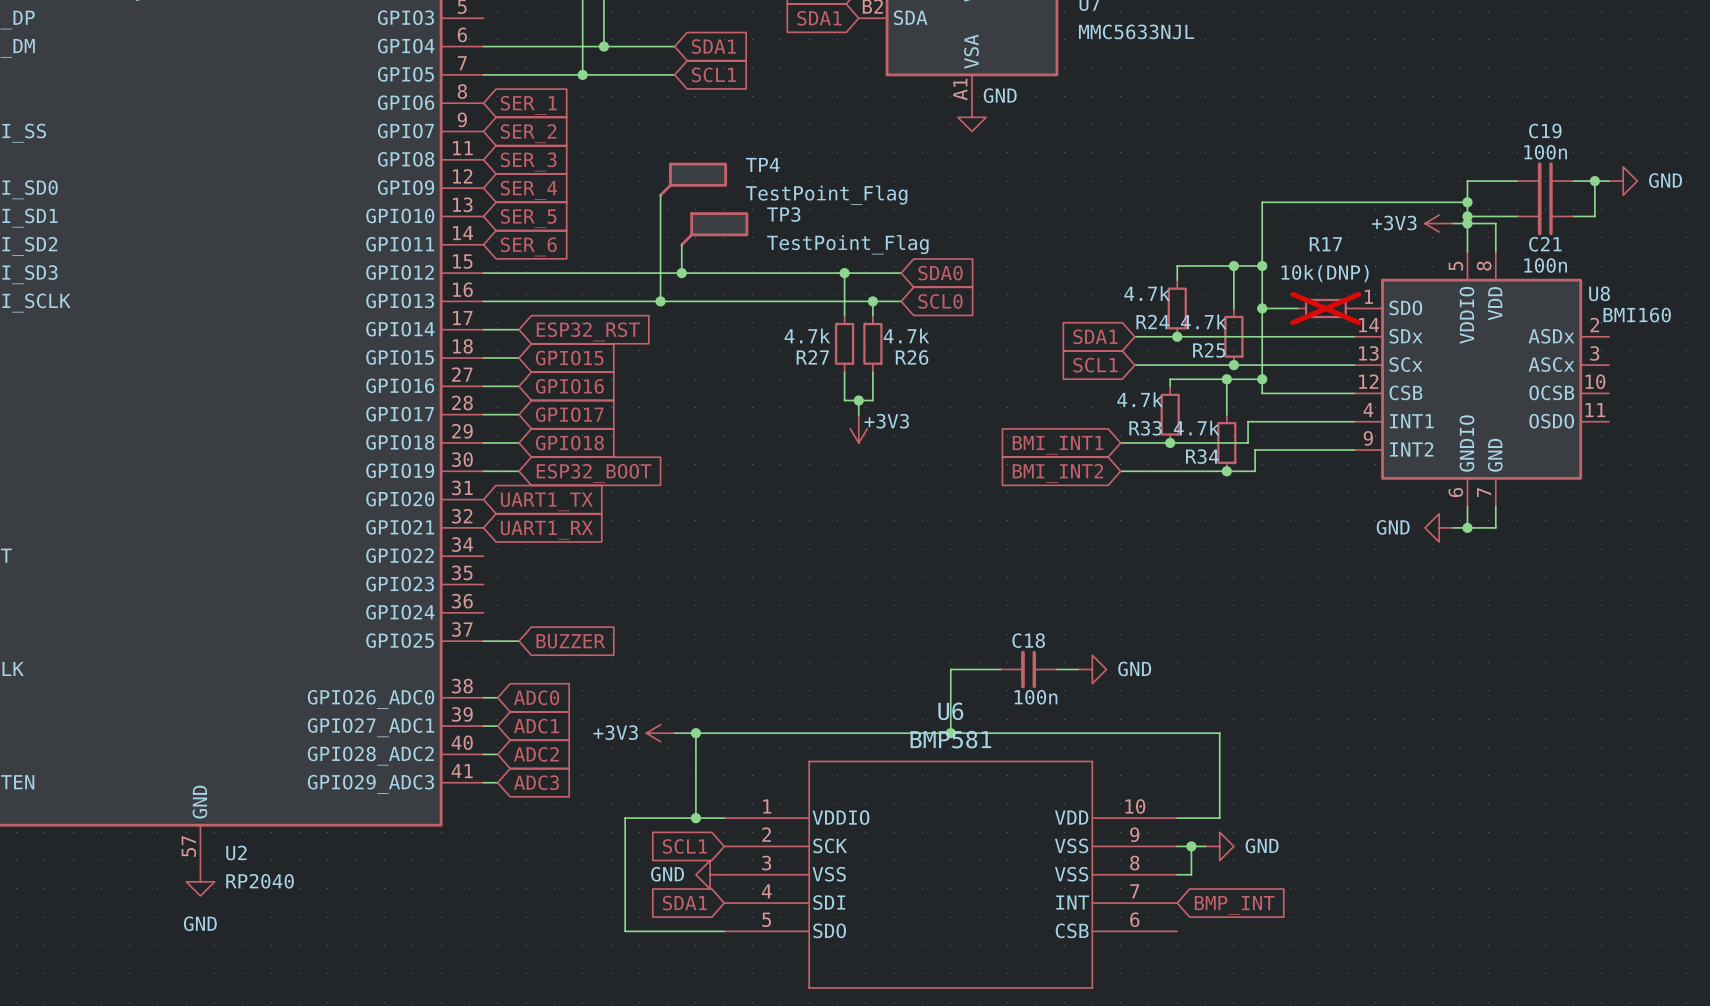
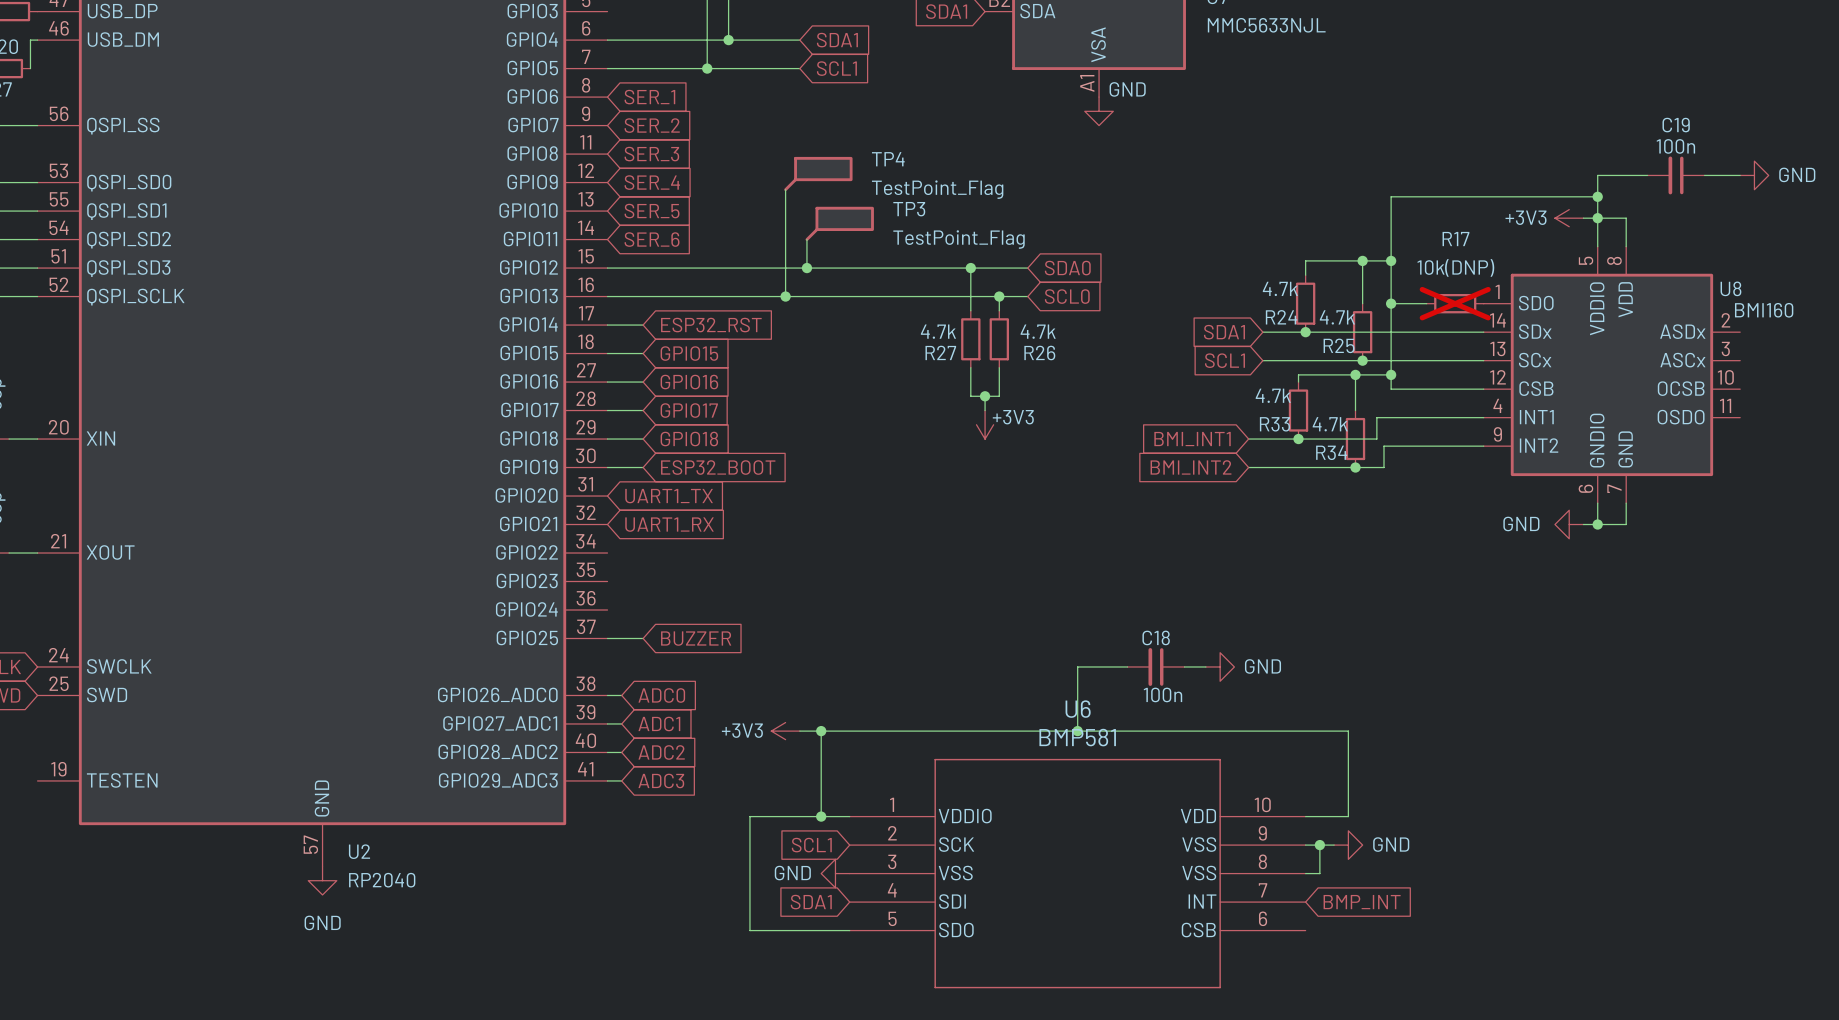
wire: (1594, 181) (1594, 216) (1573, 216) -> none
junction: (1594, 181) -> none
wire: (1467, 216) (1517, 216) -> none
junction: (1467, 216) -> none
C21: 100n (1545, 216) -> none

